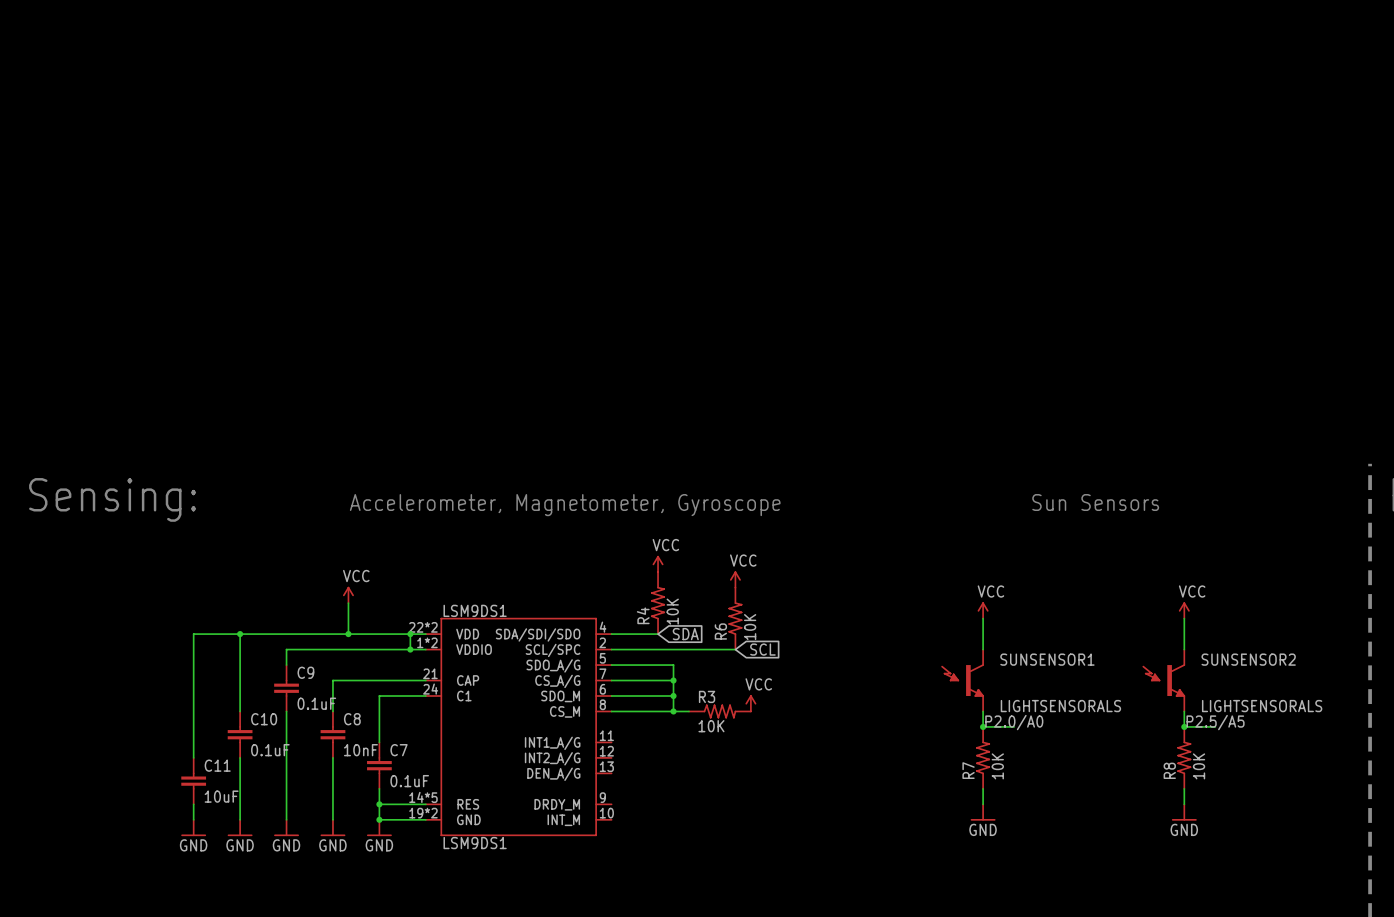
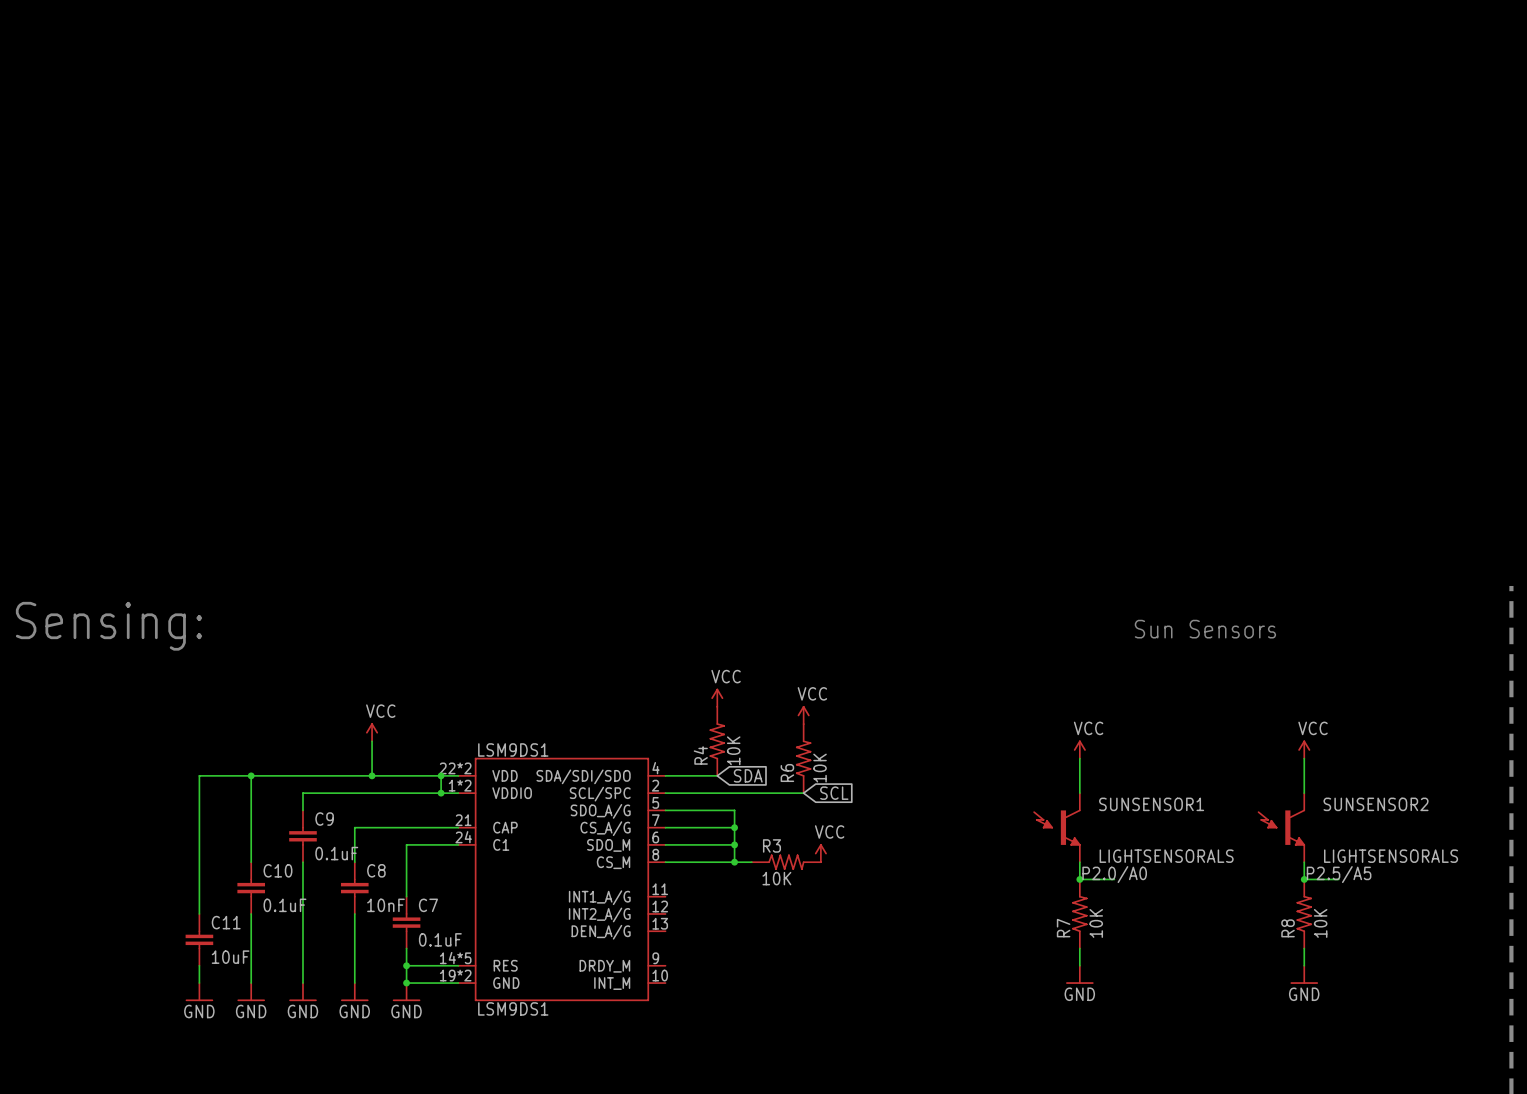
text: Accelerometer, Magnetometer, Gyroscope (565, 505) -> none

